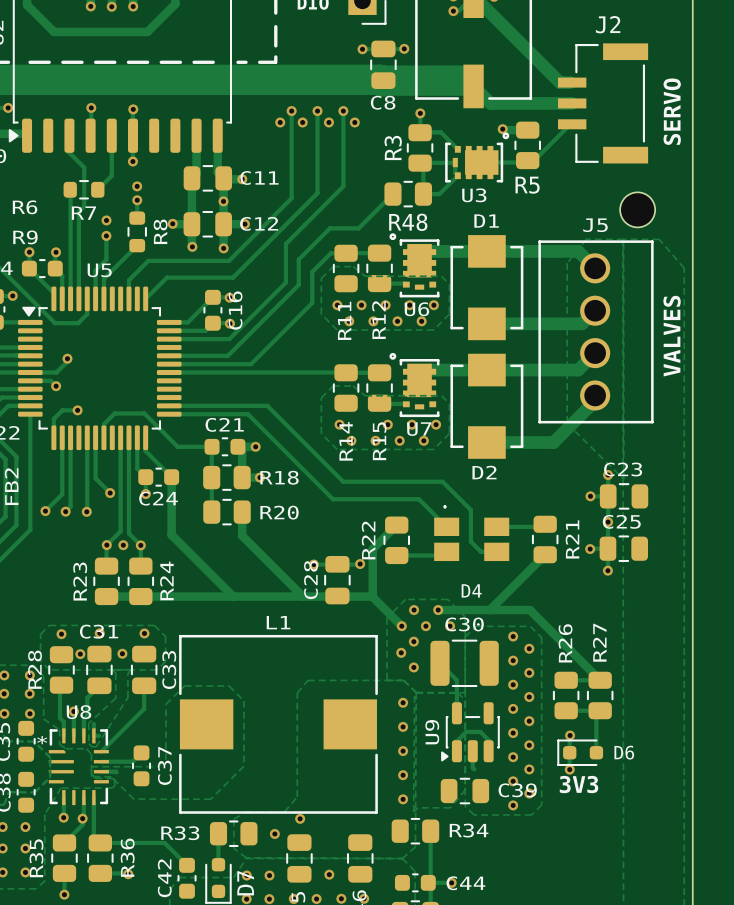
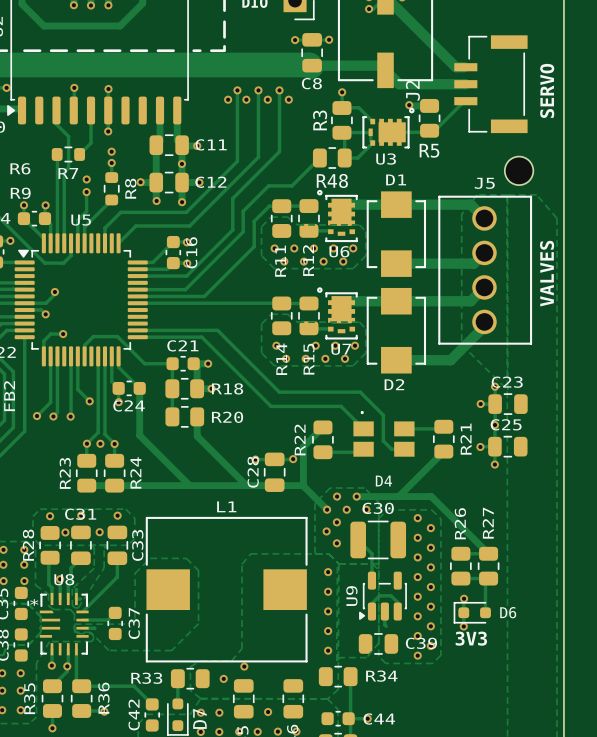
J2 name rotation: 0° (608, 24) -> 90° counterclockwise (412, 90)
J2 name position: J2 (608, 24) -> J2 (412, 90)
track width: thick (383, 80) (467, 80) -> thin (312, 65) (380, 65)

